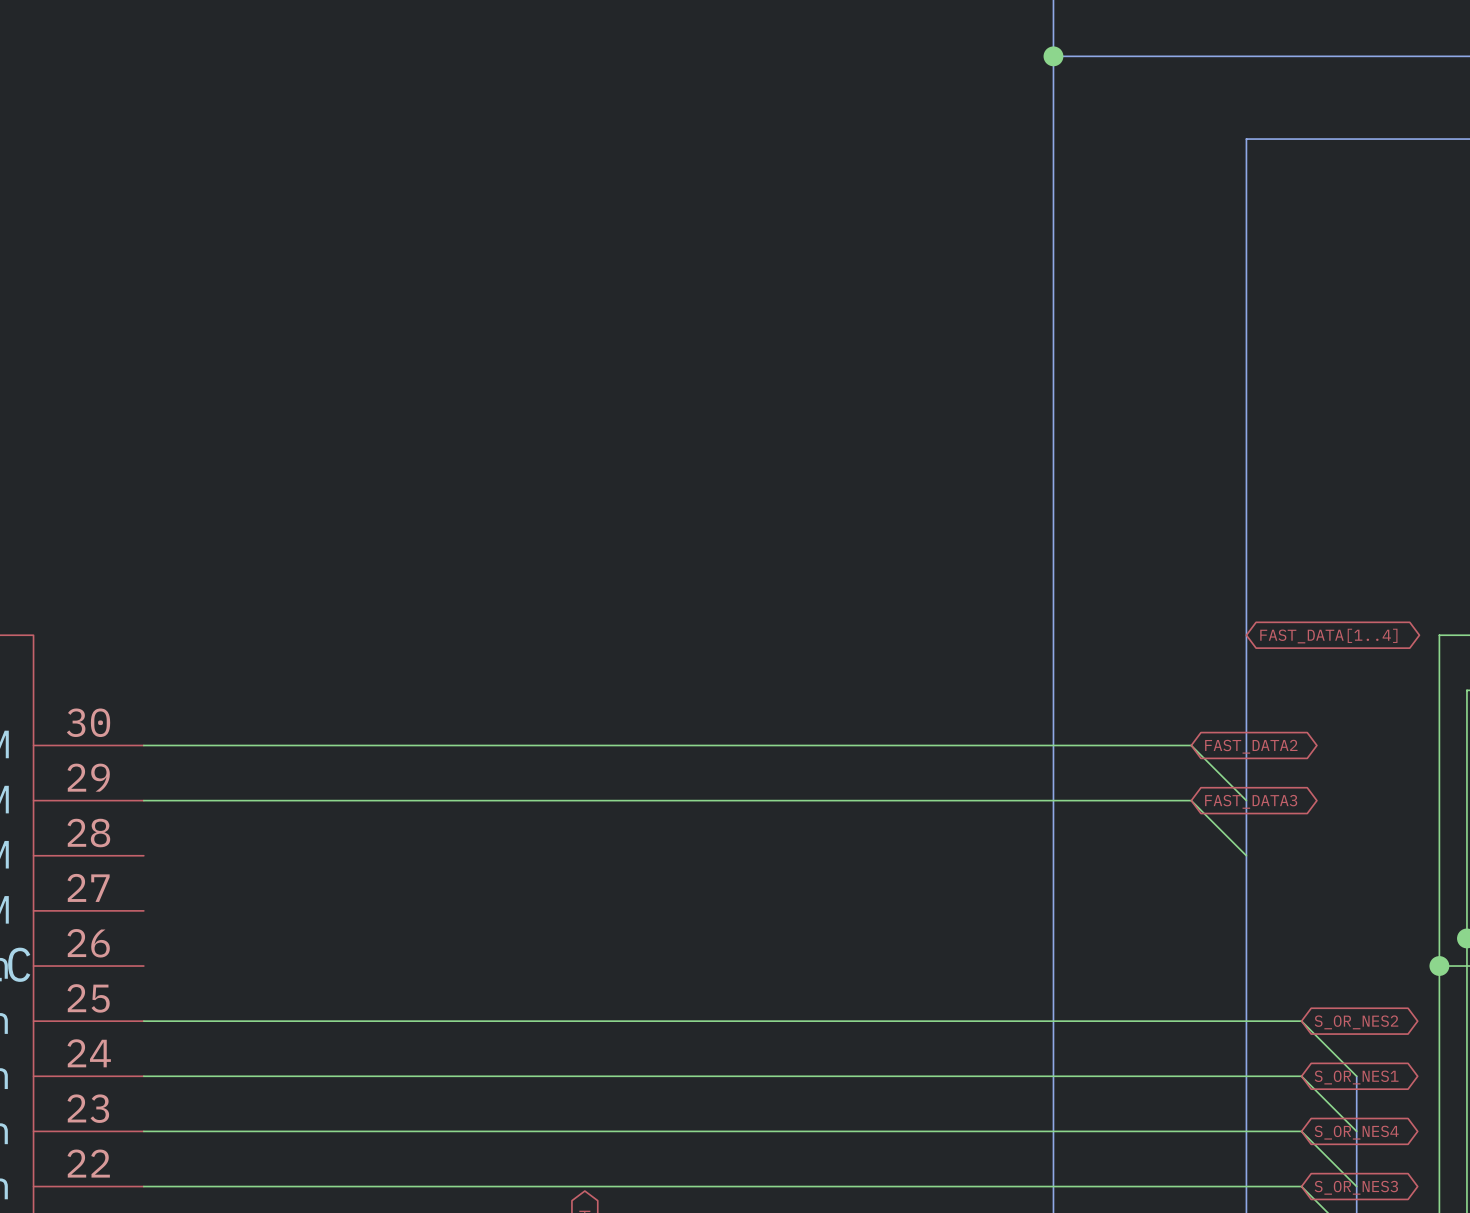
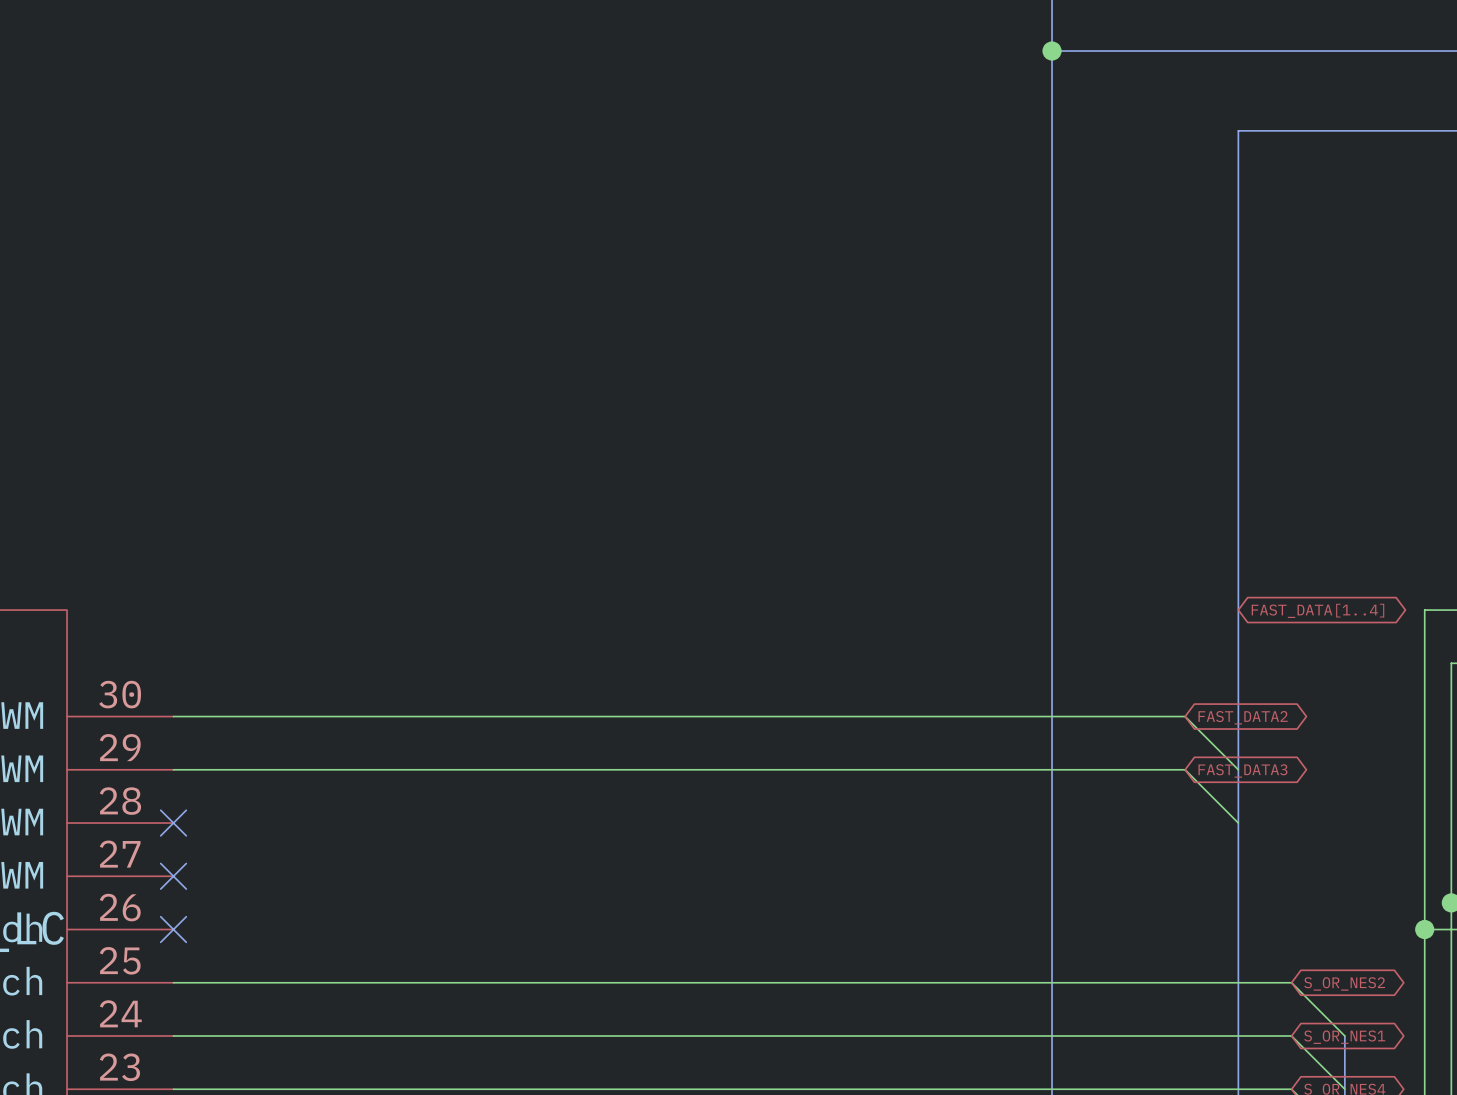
no-connect mark: none -> (173, 823)
no-connect mark: none -> (173, 876)
no-connect mark: none -> (173, 929)

